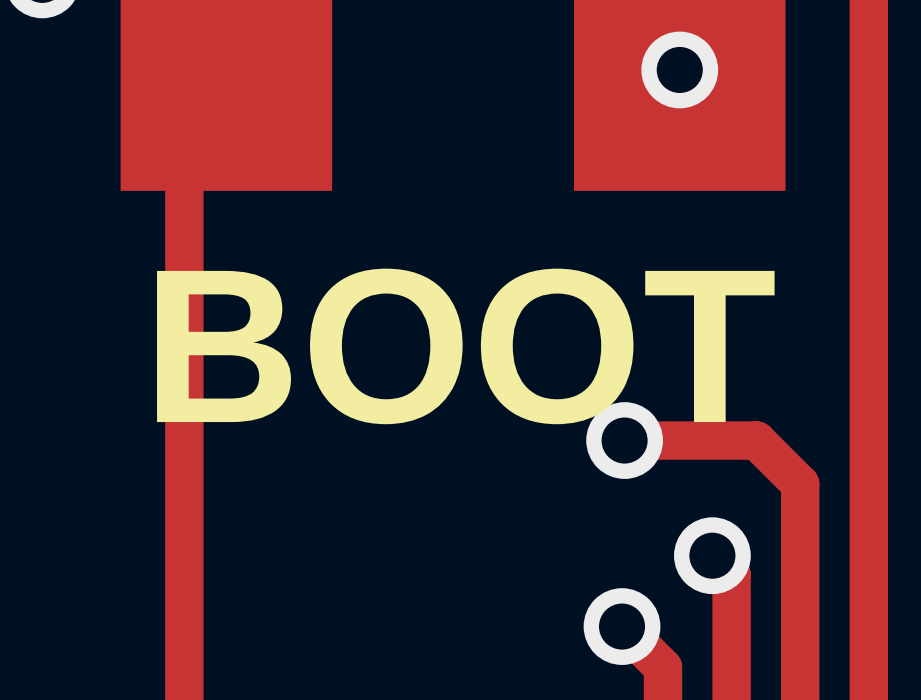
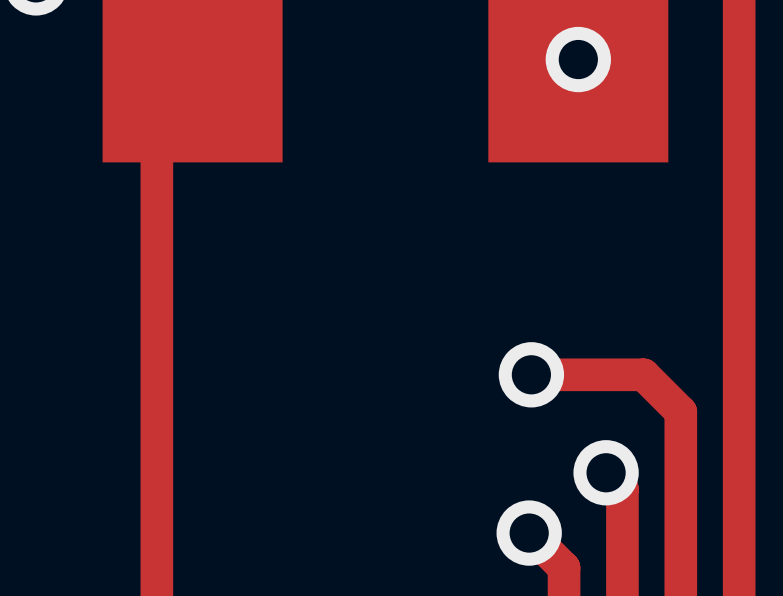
text: BOOT (465, 346) -> none

